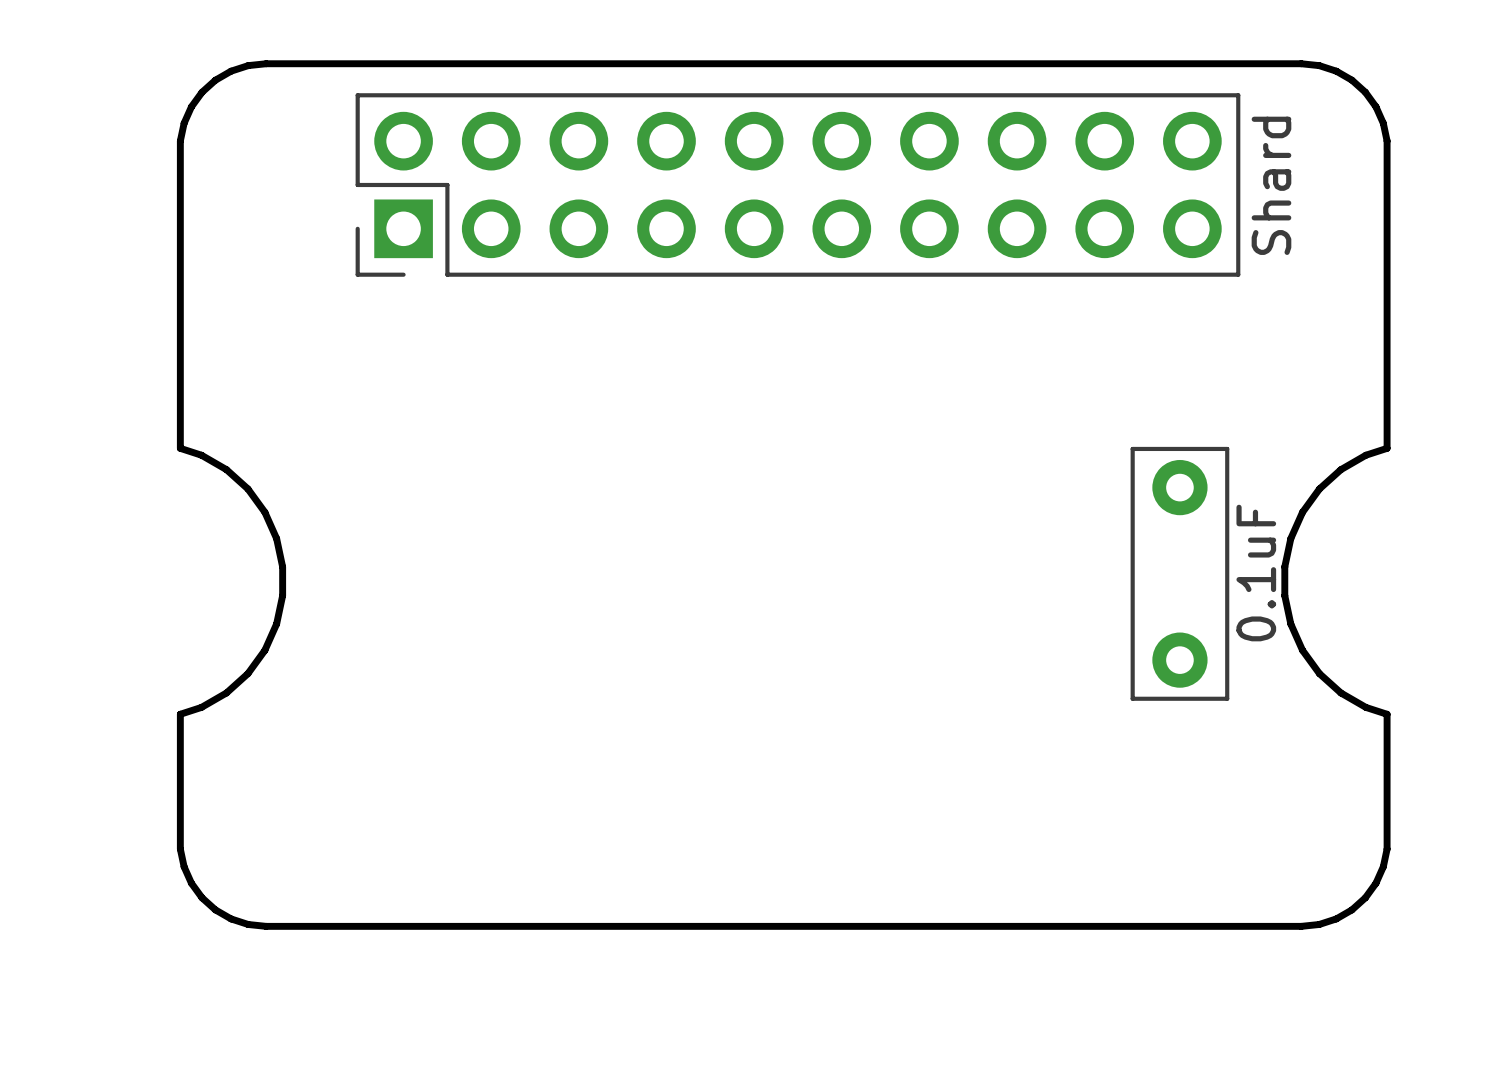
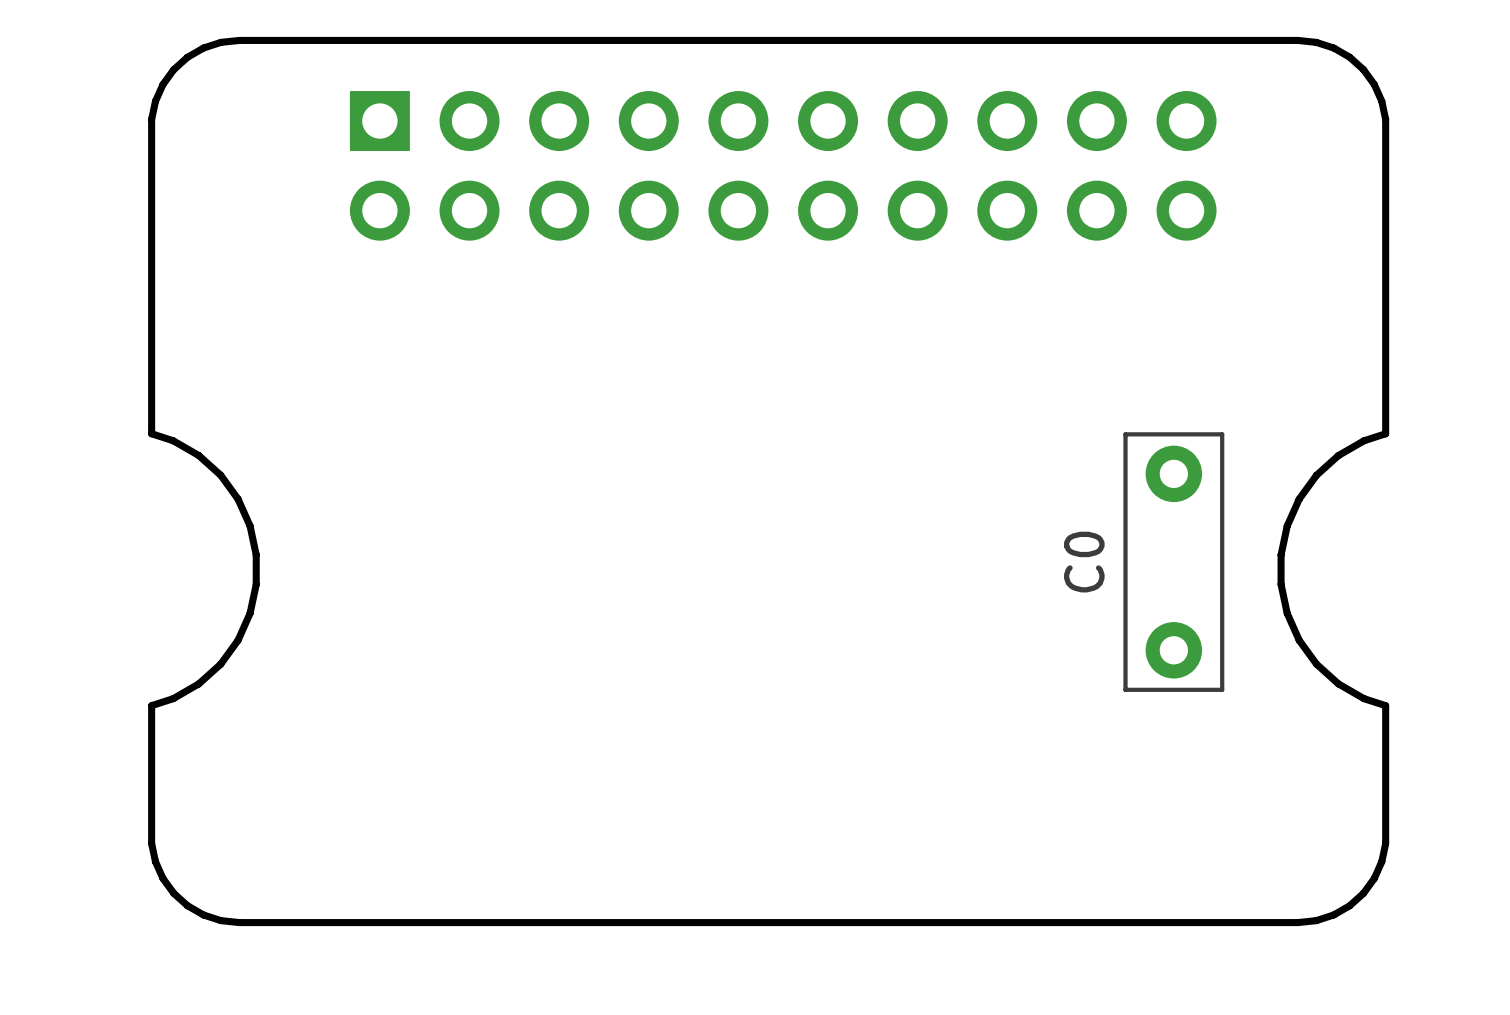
part side: top (797, 184) -> bottom (783, 165)
C0 name: none -> C0 (1084, 562)
C0 value: 0.1uF (1256, 573) -> none

